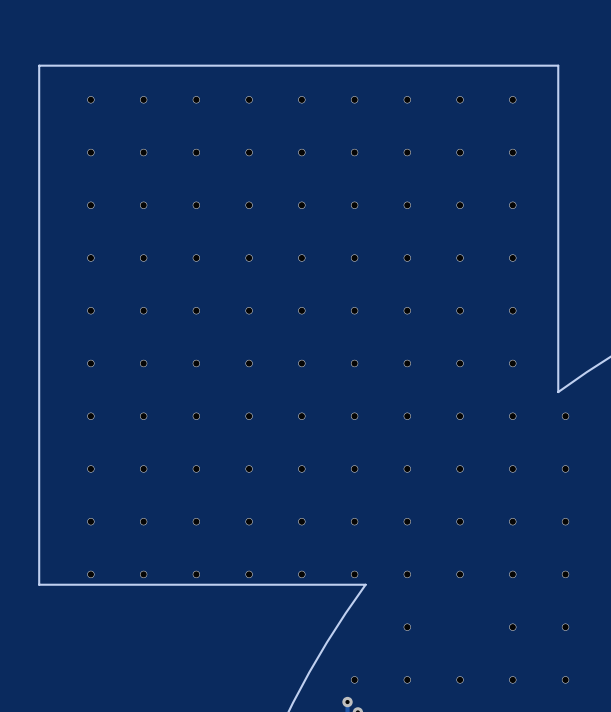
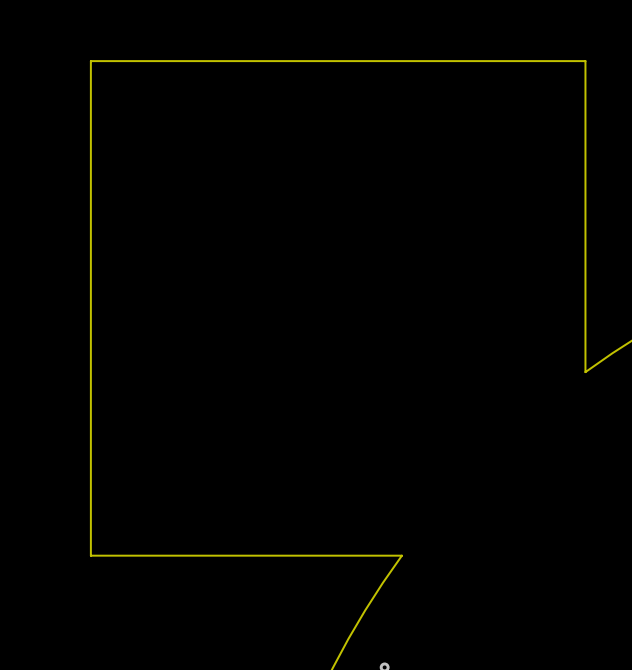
part: (90, 99) -> none
part: (143, 99) -> none
part: (196, 99) -> none
part: (249, 99) -> none
part: (301, 99) -> none
part: (354, 99) -> none
part: (407, 99) -> none
part: (460, 99) -> none
part: (512, 99) -> none
part: (90, 152) -> none
part: (143, 152) -> none
part: (196, 152) -> none
part: (249, 152) -> none
part: (301, 152) -> none
part: (354, 152) -> none
part: (407, 152) -> none
part: (460, 152) -> none
part: (512, 152) -> none
part: (90, 205) -> none
part: (143, 205) -> none
part: (196, 205) -> none
part: (249, 205) -> none
part: (301, 205) -> none
part: (354, 205) -> none
part: (407, 205) -> none
part: (460, 205) -> none
part: (512, 205) -> none
part: (90, 258) -> none
part: (143, 258) -> none
part: (196, 258) -> none
part: (249, 258) -> none
part: (301, 258) -> none
part: (354, 258) -> none
part: (407, 258) -> none
part: (460, 258) -> none
part: (512, 258) -> none
part: (90, 310) -> none
part: (143, 310) -> none
part: (196, 310) -> none
part: (249, 310) -> none
part: (301, 310) -> none
part: (354, 310) -> none
part: (407, 310) -> none
part: (460, 310) -> none
part: (512, 310) -> none
part: (90, 363) -> none
part: (143, 363) -> none
part: (196, 363) -> none
part: (249, 363) -> none
part: (301, 363) -> none
part: (354, 363) -> none
part: (407, 363) -> none
part: (460, 363) -> none
part: (512, 363) -> none
part: (90, 416) -> none
part: (143, 416) -> none
part: (196, 416) -> none
part: (249, 416) -> none
part: (301, 416) -> none
part: (354, 416) -> none
part: (407, 416) -> none
part: (460, 416) -> none
part: (512, 416) -> none
part: (565, 416) -> none
part: (90, 468) -> none
part: (143, 468) -> none
part: (196, 468) -> none
part: (249, 468) -> none
part: (301, 468) -> none
part: (354, 468) -> none
part: (407, 468) -> none
part: (460, 468) -> none
part: (512, 468) -> none
part: (565, 468) -> none
part: (90, 521) -> none
part: (143, 521) -> none
part: (196, 521) -> none
part: (249, 521) -> none
part: (301, 521) -> none
part: (354, 521) -> none
part: (407, 521) -> none
part: (460, 521) -> none
part: (512, 521) -> none
part: (565, 521) -> none
part: (90, 574) -> none
part: (143, 574) -> none
part: (196, 574) -> none
part: (249, 574) -> none
part: (301, 574) -> none
part: (354, 574) -> none
part: (407, 574) -> none
part: (460, 574) -> none
part: (512, 574) -> none
part: (565, 574) -> none
part: (407, 627) -> none
part: (512, 627) -> none
part: (565, 627) -> none
part: (354, 679) -> none
part: (407, 679) -> none
part: (460, 679) -> none
part: (512, 679) -> none
part: (565, 679) -> none

